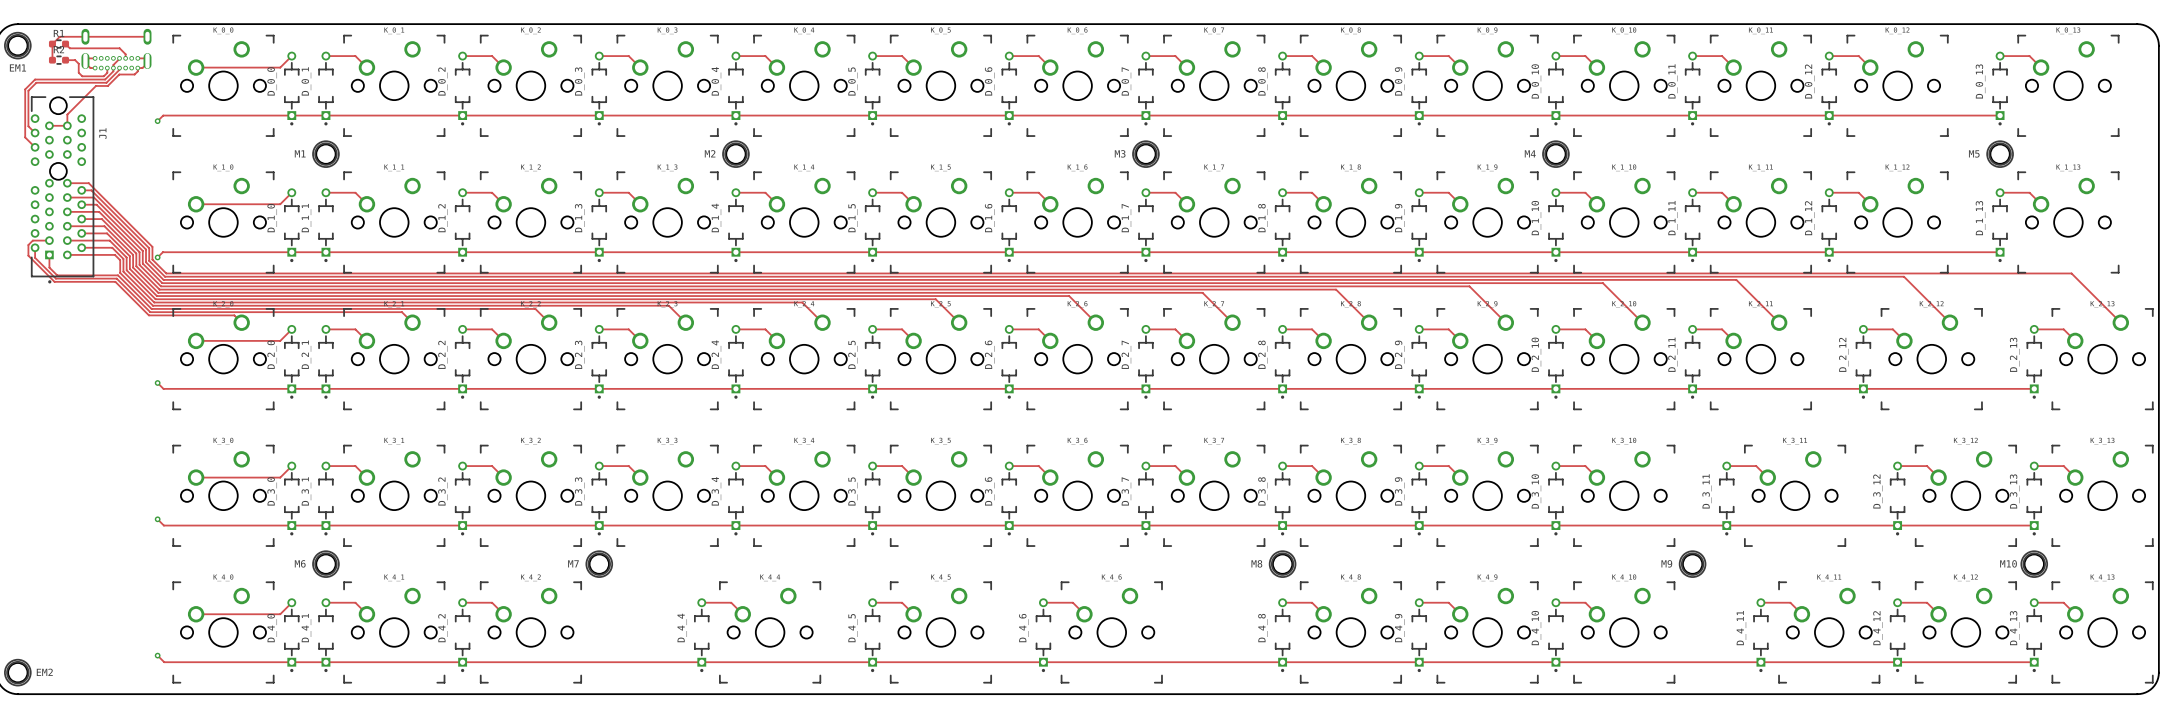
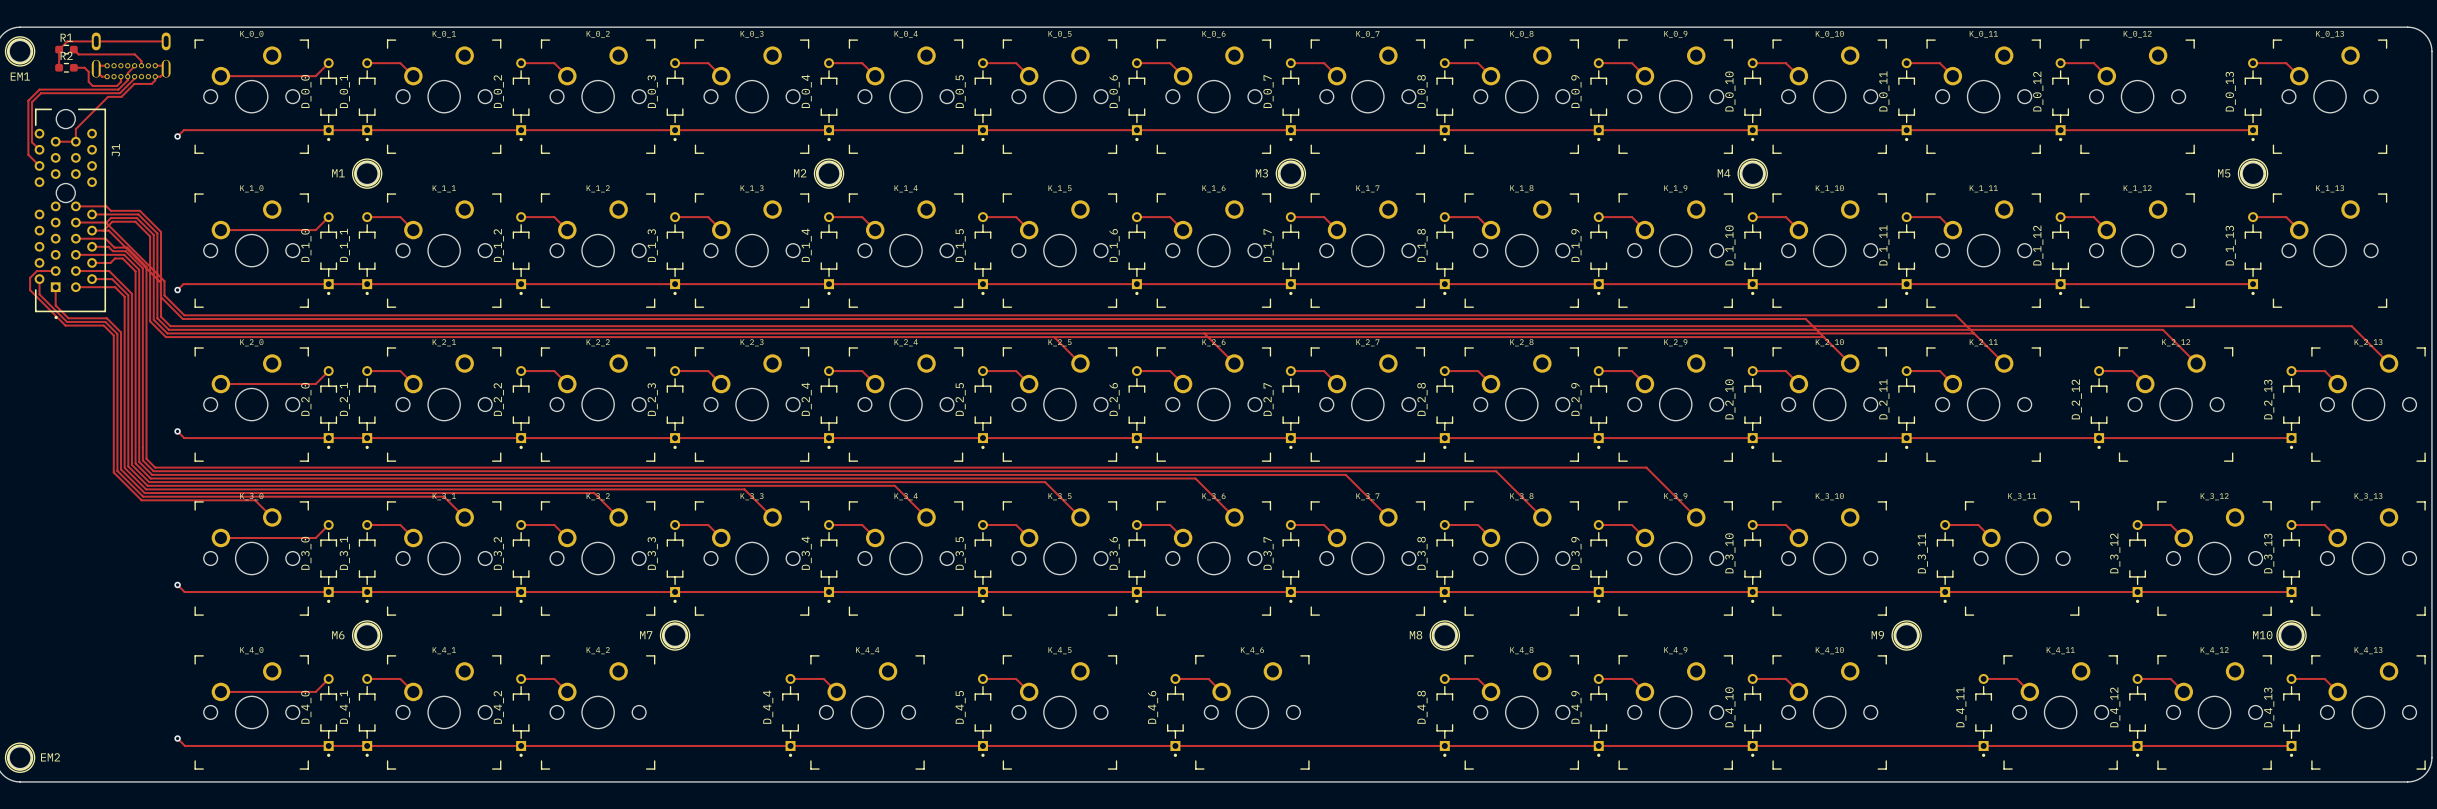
track: (88, 183) (152, 246) (152, 259) (166, 273) (2071, 273) (2087, 289) -> (100, 206) (106, 206) (110, 210) (139, 210) (161, 231) (161, 316) (170, 326) (2351, 326)
track: (91, 190) (149, 248) (149, 260) (164, 276) (1903, 276) (1920, 292) -> (102, 214) (138, 214) (157, 233) (157, 318) (168, 329) (2162, 329)
track: (93, 211) (99, 211) (139, 252) (139, 264) (160, 286) (1469, 286) (1505, 322) -> (105, 238) (114, 247) (127, 247) (146, 266) (146, 458) (155, 467) (1646, 467) (1696, 517)
track: (96, 219) (101, 219) (136, 253) (136, 266) (159, 289) (1336, 289) (1369, 322) -> (108, 246) (112, 251) (125, 251) (142, 268) (142, 447)
track: (104, 226) (133, 254) (133, 267) (158, 292) (1202, 292) (1232, 322) -> (117, 254) (124, 254) (139, 269) (139, 461) (152, 474) (1345, 474) (1388, 517)
track: (98, 233) (107, 233) (129, 256) (129, 268) (156, 296) -> (105, 222) (110, 218) (136, 218) (153, 234) (153, 319) (167, 333) (176, 333)
track: none -> (110, 262) (114, 258) (122, 258) (135, 271) (135, 463) (150, 478) (1195, 478) (1234, 517)
track: (96, 240) (109, 240) (126, 257) (126, 270) (155, 299) -> (103, 230) (112, 221) (135, 221) (150, 236) (150, 321) (165, 337) (175, 337)
track: none -> (109, 271) (131, 293) (131, 464) (149, 482) (1045, 482) (1080, 517)
track: (28, 245) (28, 255) (54, 281) (115, 281) (148, 315) (234, 315) (241, 322) -> (32, 275) (30, 277) (30, 290) (65, 325) (103, 325) (113, 335) (113, 472) (141, 500) (255, 500) (272, 517)
track: (99, 247) (112, 247) (123, 258) (123, 271) (154, 302) (802, 302) (822, 322) -> (112, 279) (128, 295) (128, 466) (147, 485) (894, 485) (926, 517)
track: (102, 254) (114, 254) (120, 260) (120, 272) (152, 305) (668, 305) (685, 322) -> (115, 287) (124, 296) (124, 467) (146, 489) (744, 489) (772, 517)
track: (35, 257) (55, 278) (116, 278) (150, 312) (401, 312) (412, 322) -> (39, 290) (39, 294) (66, 321) (105, 321) (117, 333) (117, 470) (143, 496) (443, 496) (464, 517)
track: (49, 267) (57, 275) (118, 275) (151, 308) (535, 308) (549, 322) -> (55, 301) (55, 305) (68, 318) (106, 318) (121, 332) (121, 469) (144, 493) (594, 493) (618, 517)
track: none -> (142, 447) (142, 460) (153, 471) (1496, 471) (1542, 517)

